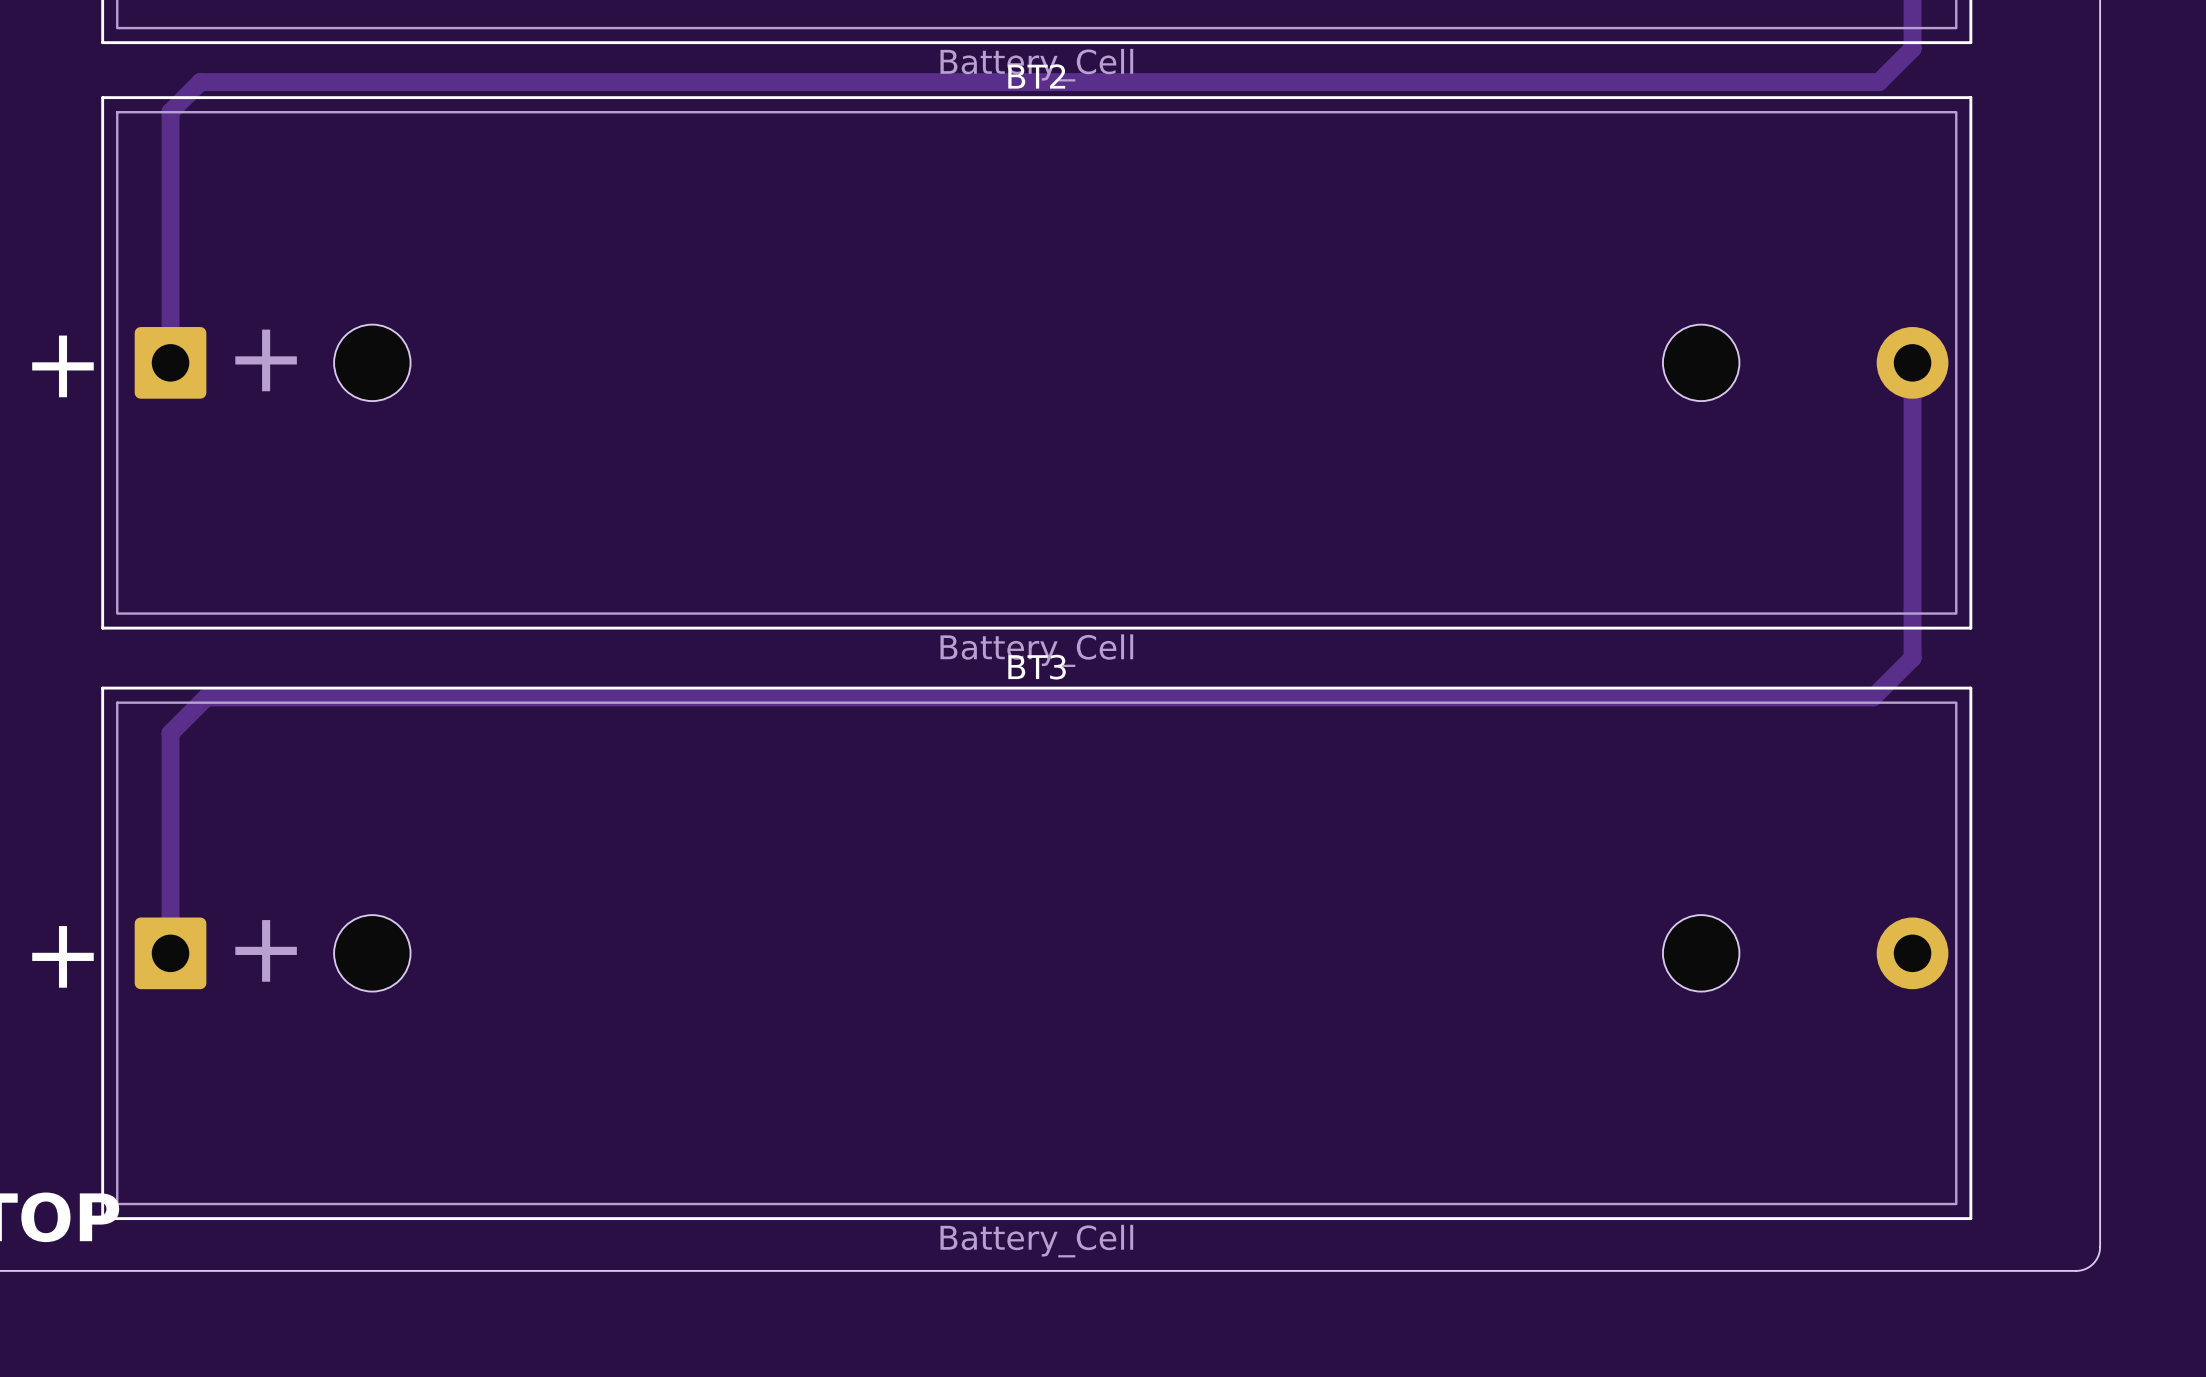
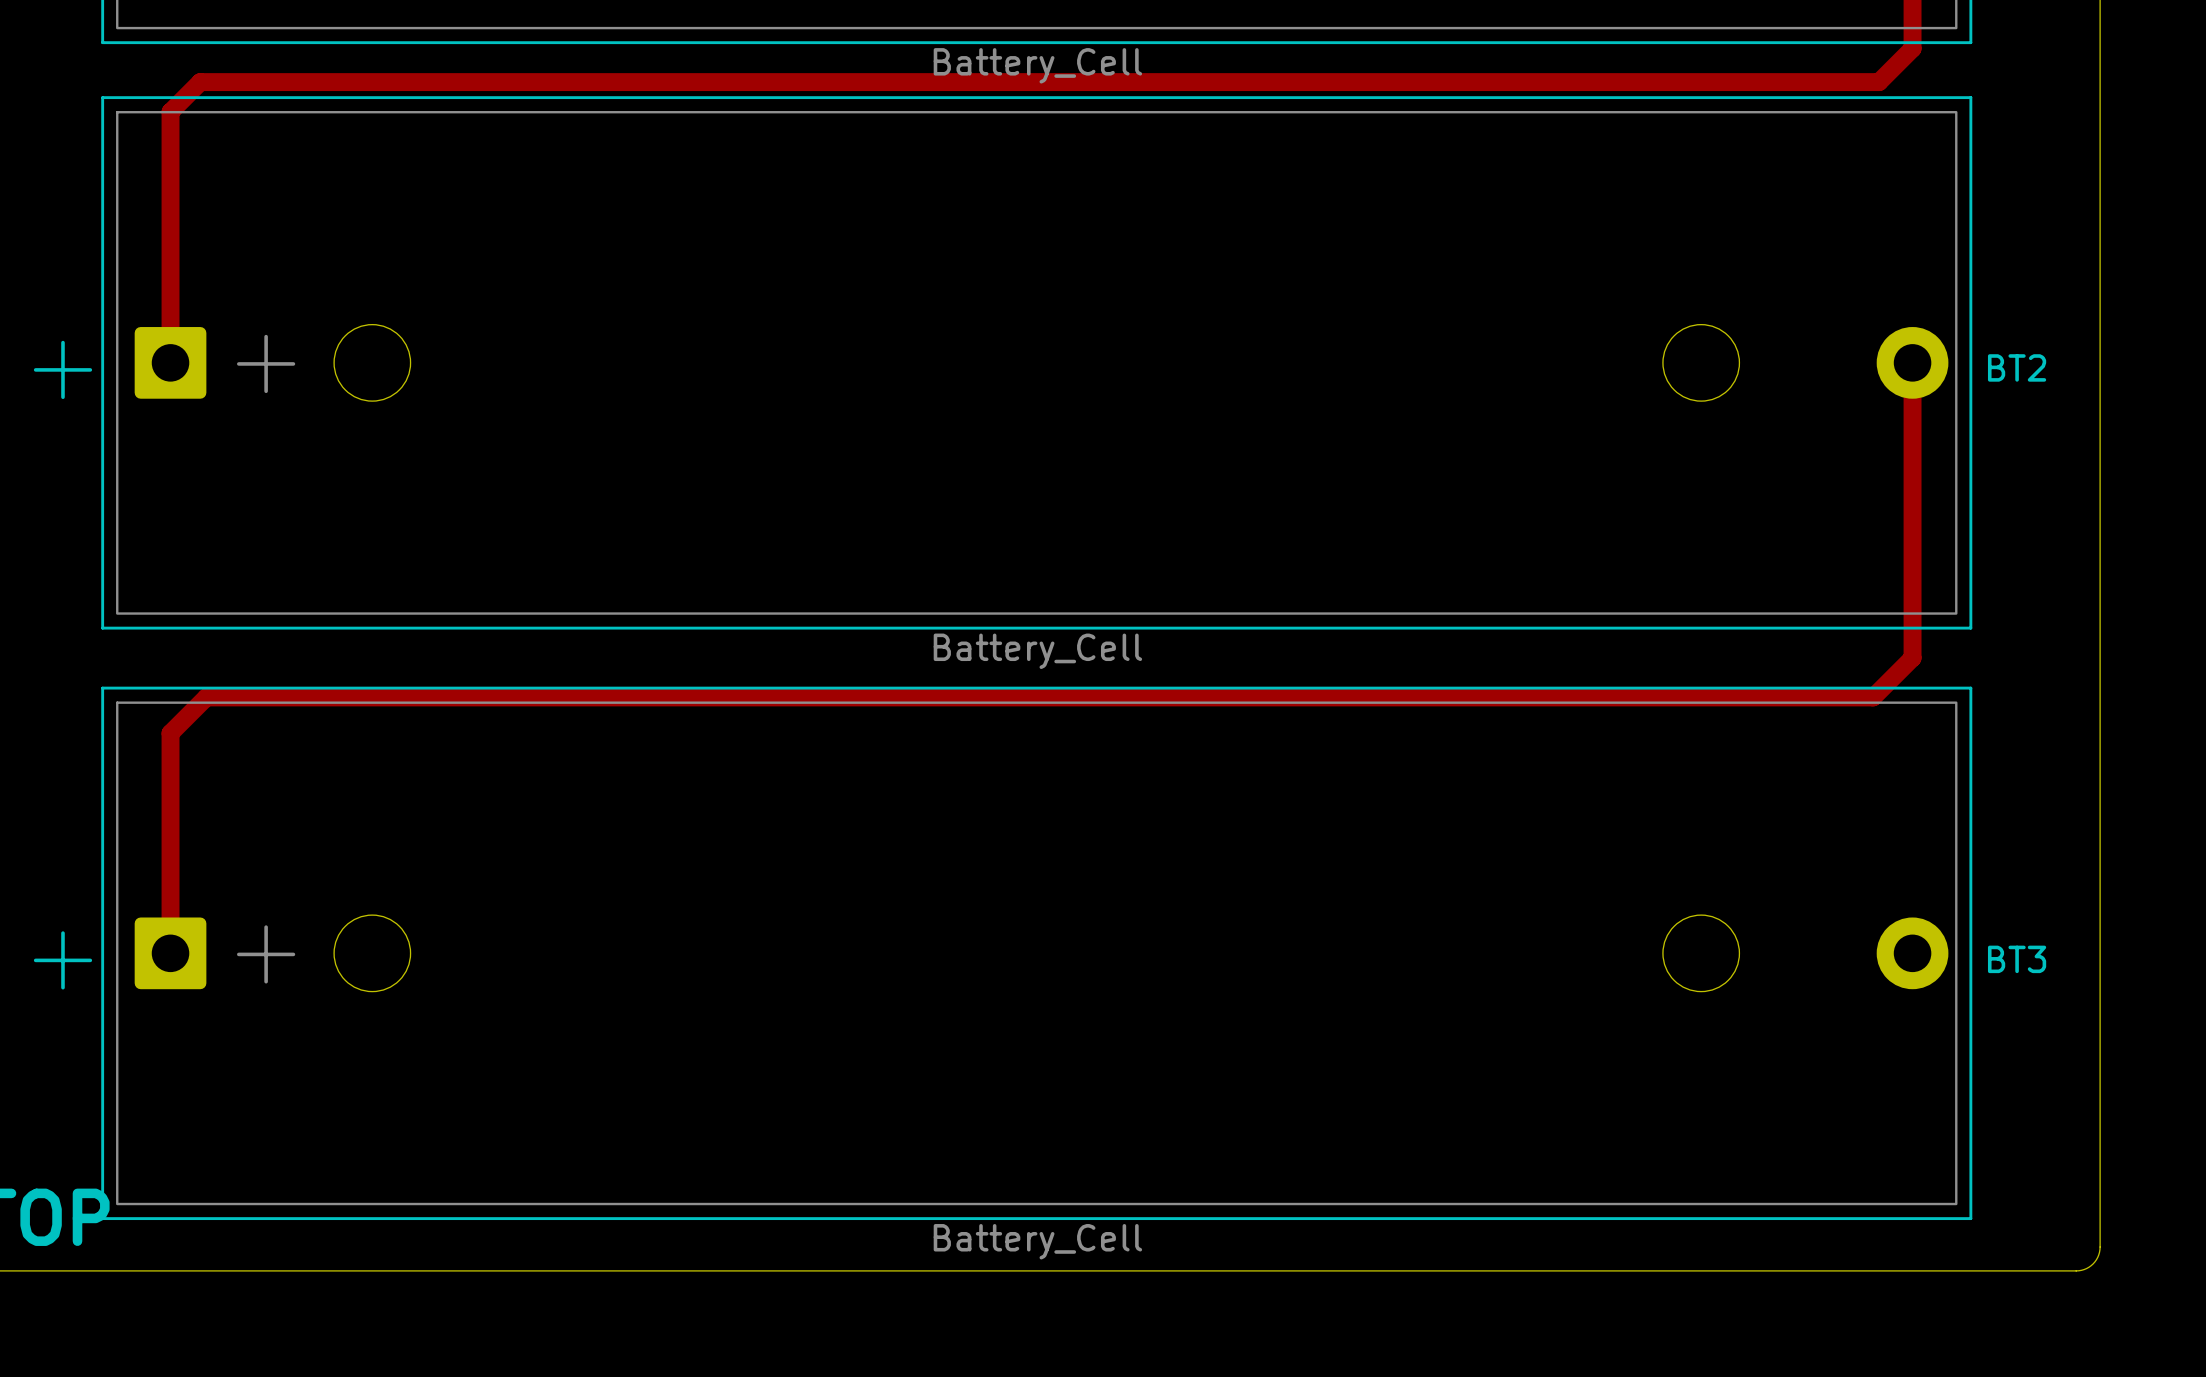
BT2 name position: BT2 (1036, 76) -> BT2 (2017, 367)
BT3 name position: BT3 (1037, 667) -> BT3 (2017, 959)

